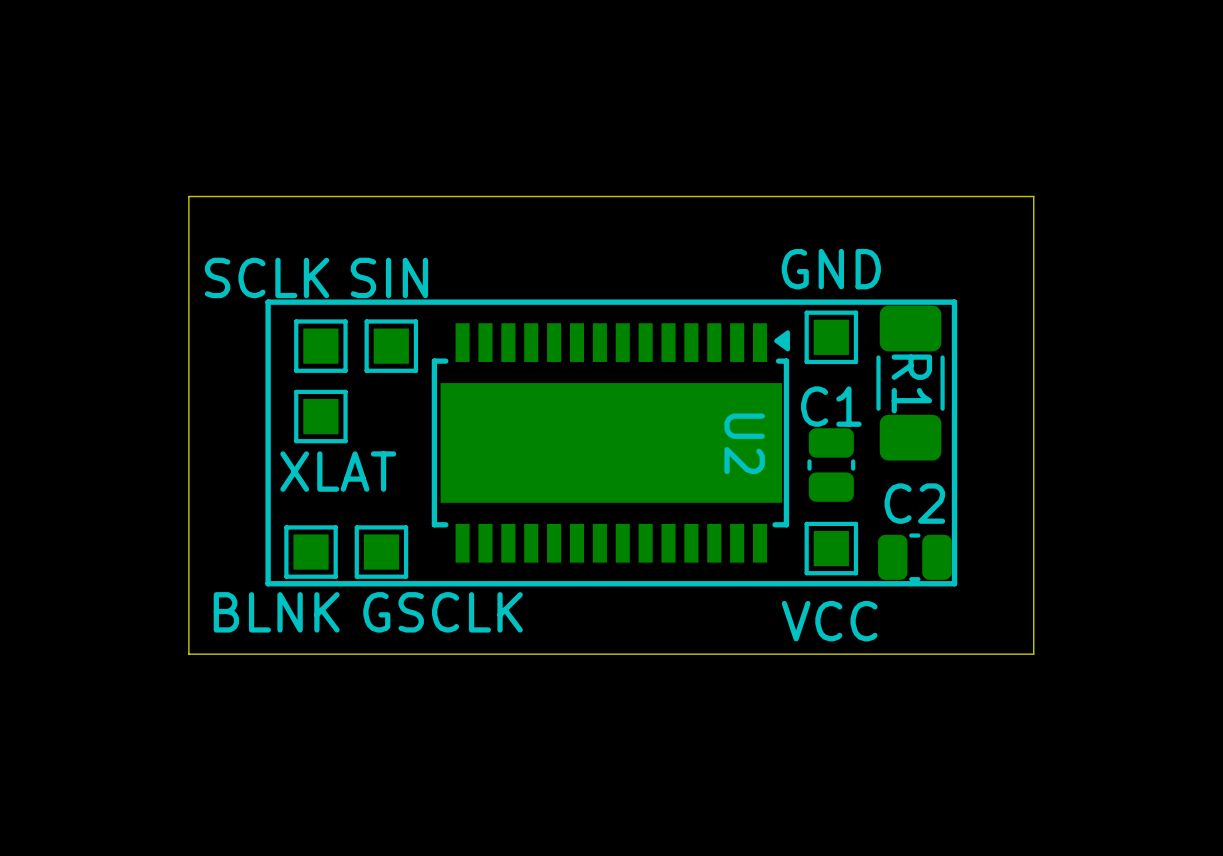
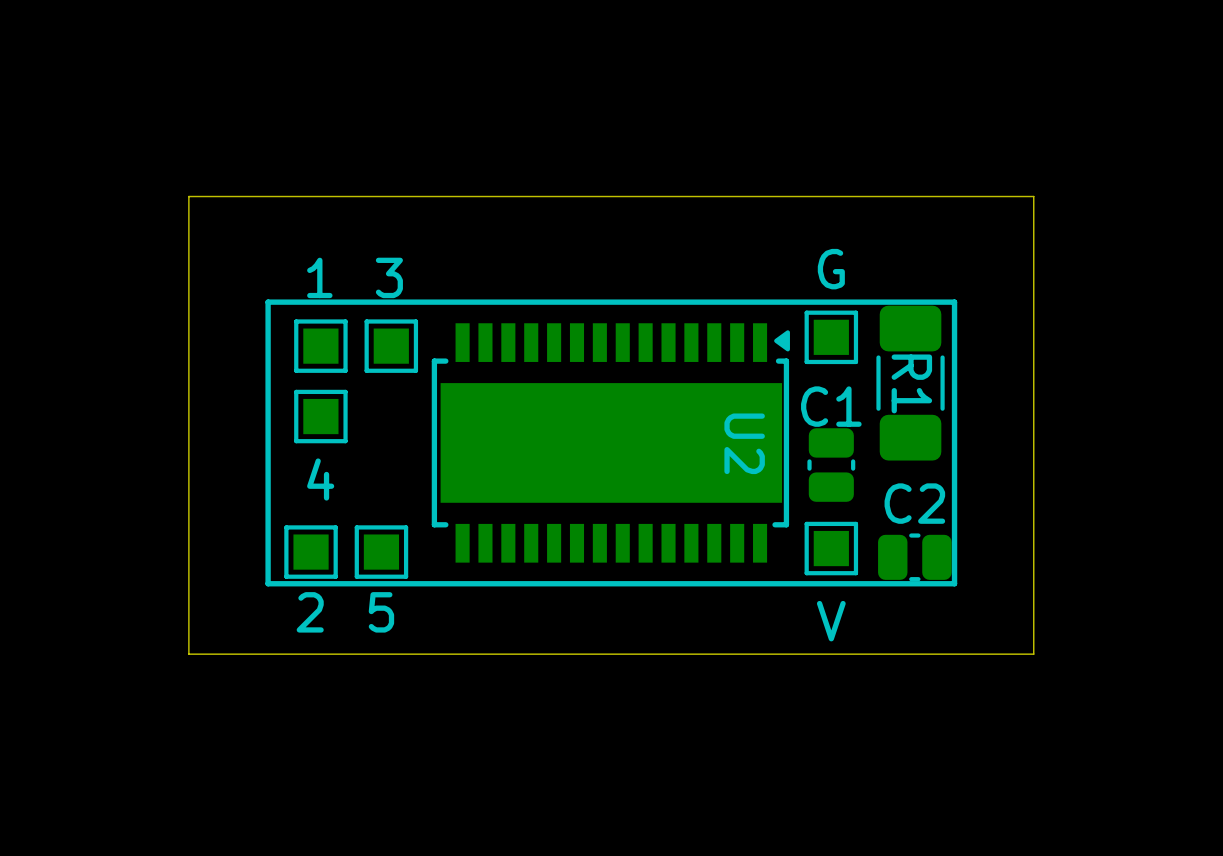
GND name: GND (831, 269) -> G (831, 269)
SCLK name: SCLK (267, 277) -> 1 (319, 277)
SIN name: SIN (389, 277) -> 3 (389, 277)
XLAT name: XLAT (338, 471) -> 4 (320, 479)
BLNK name: BLNK (276, 612) -> 2 (310, 612)
GSCLK name: GSCLK (443, 612) -> 5 (381, 612)
VCC name: VCC (829, 621) -> V (831, 621)

